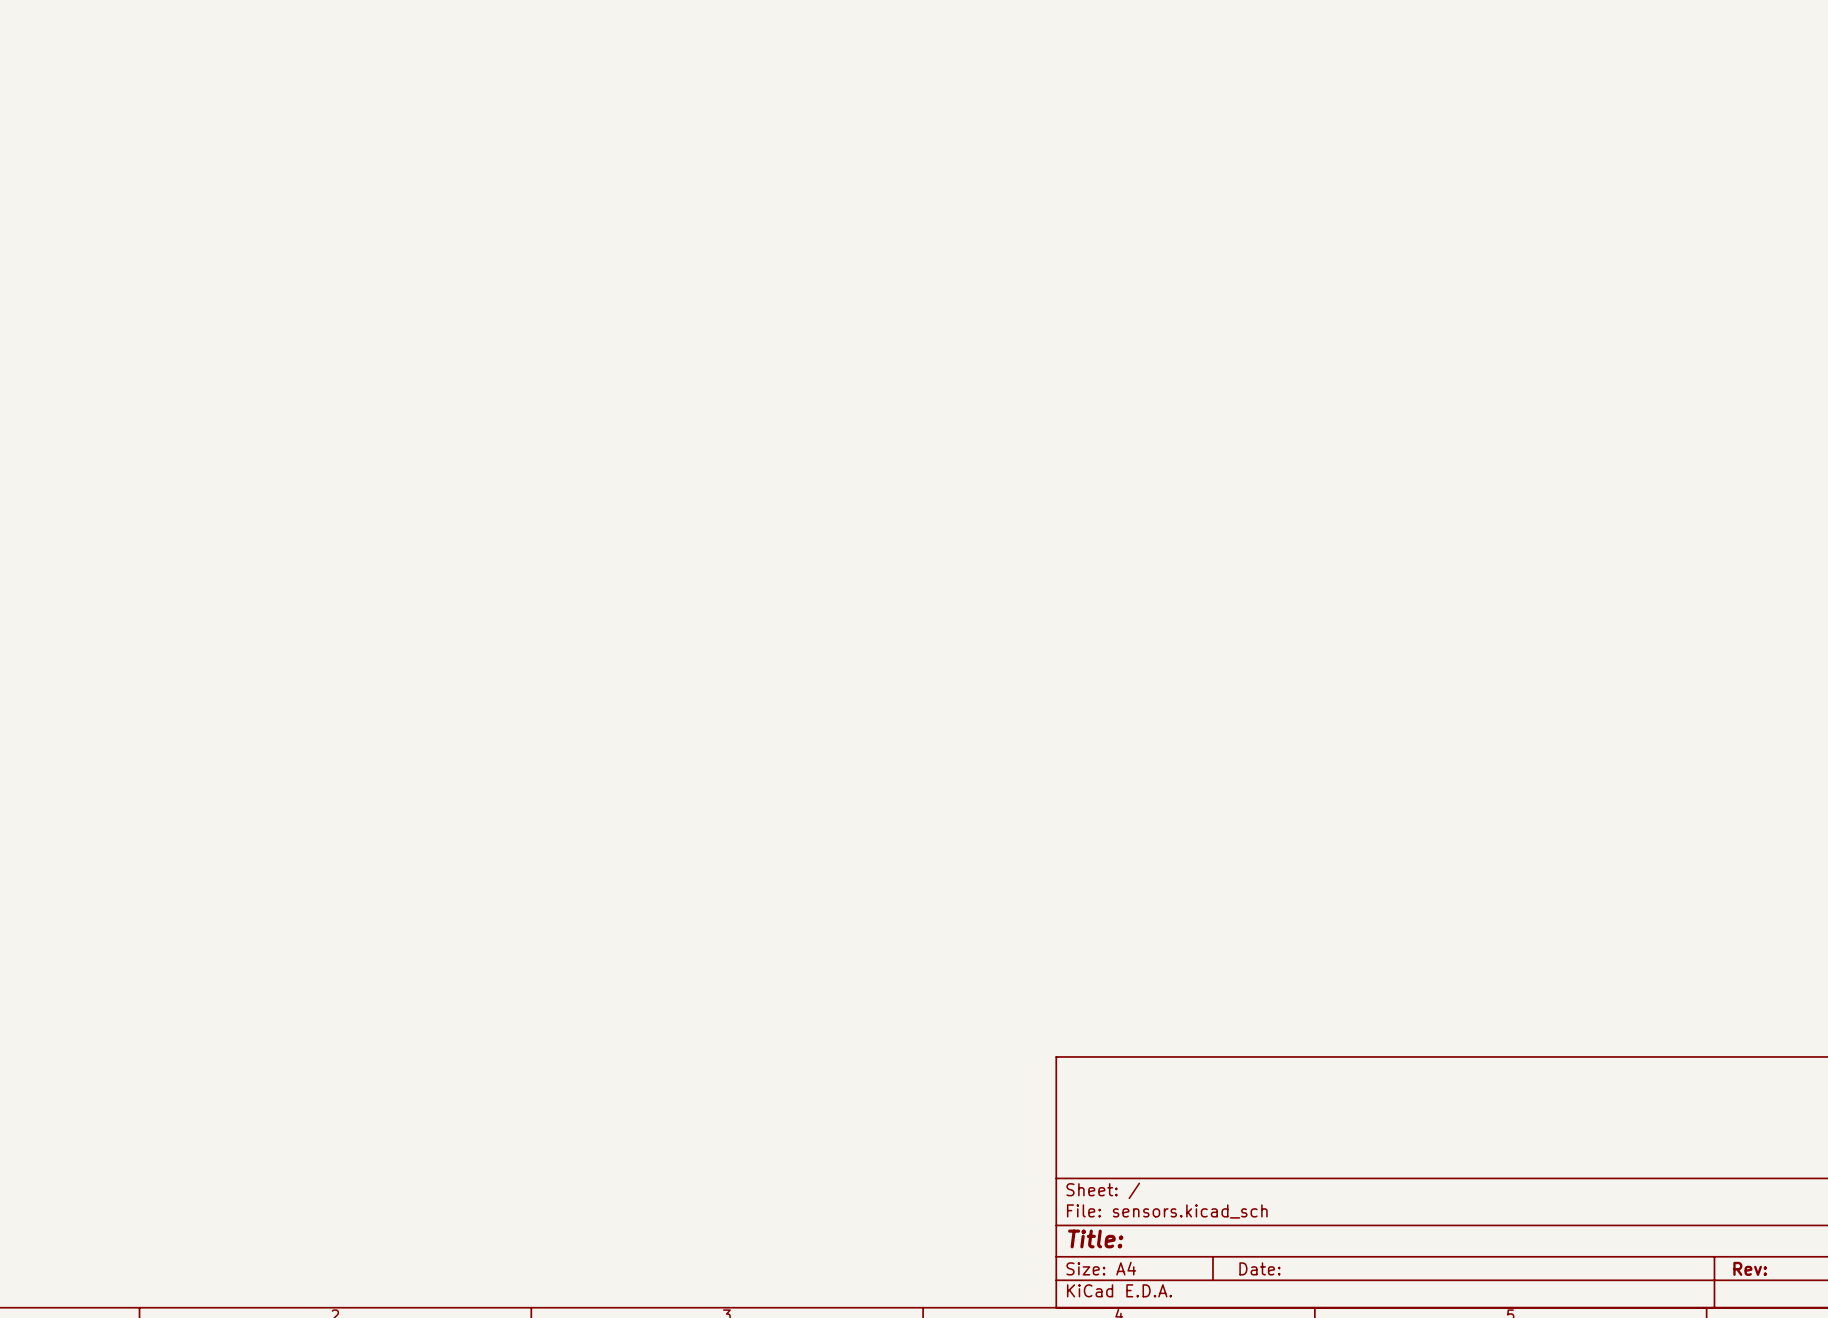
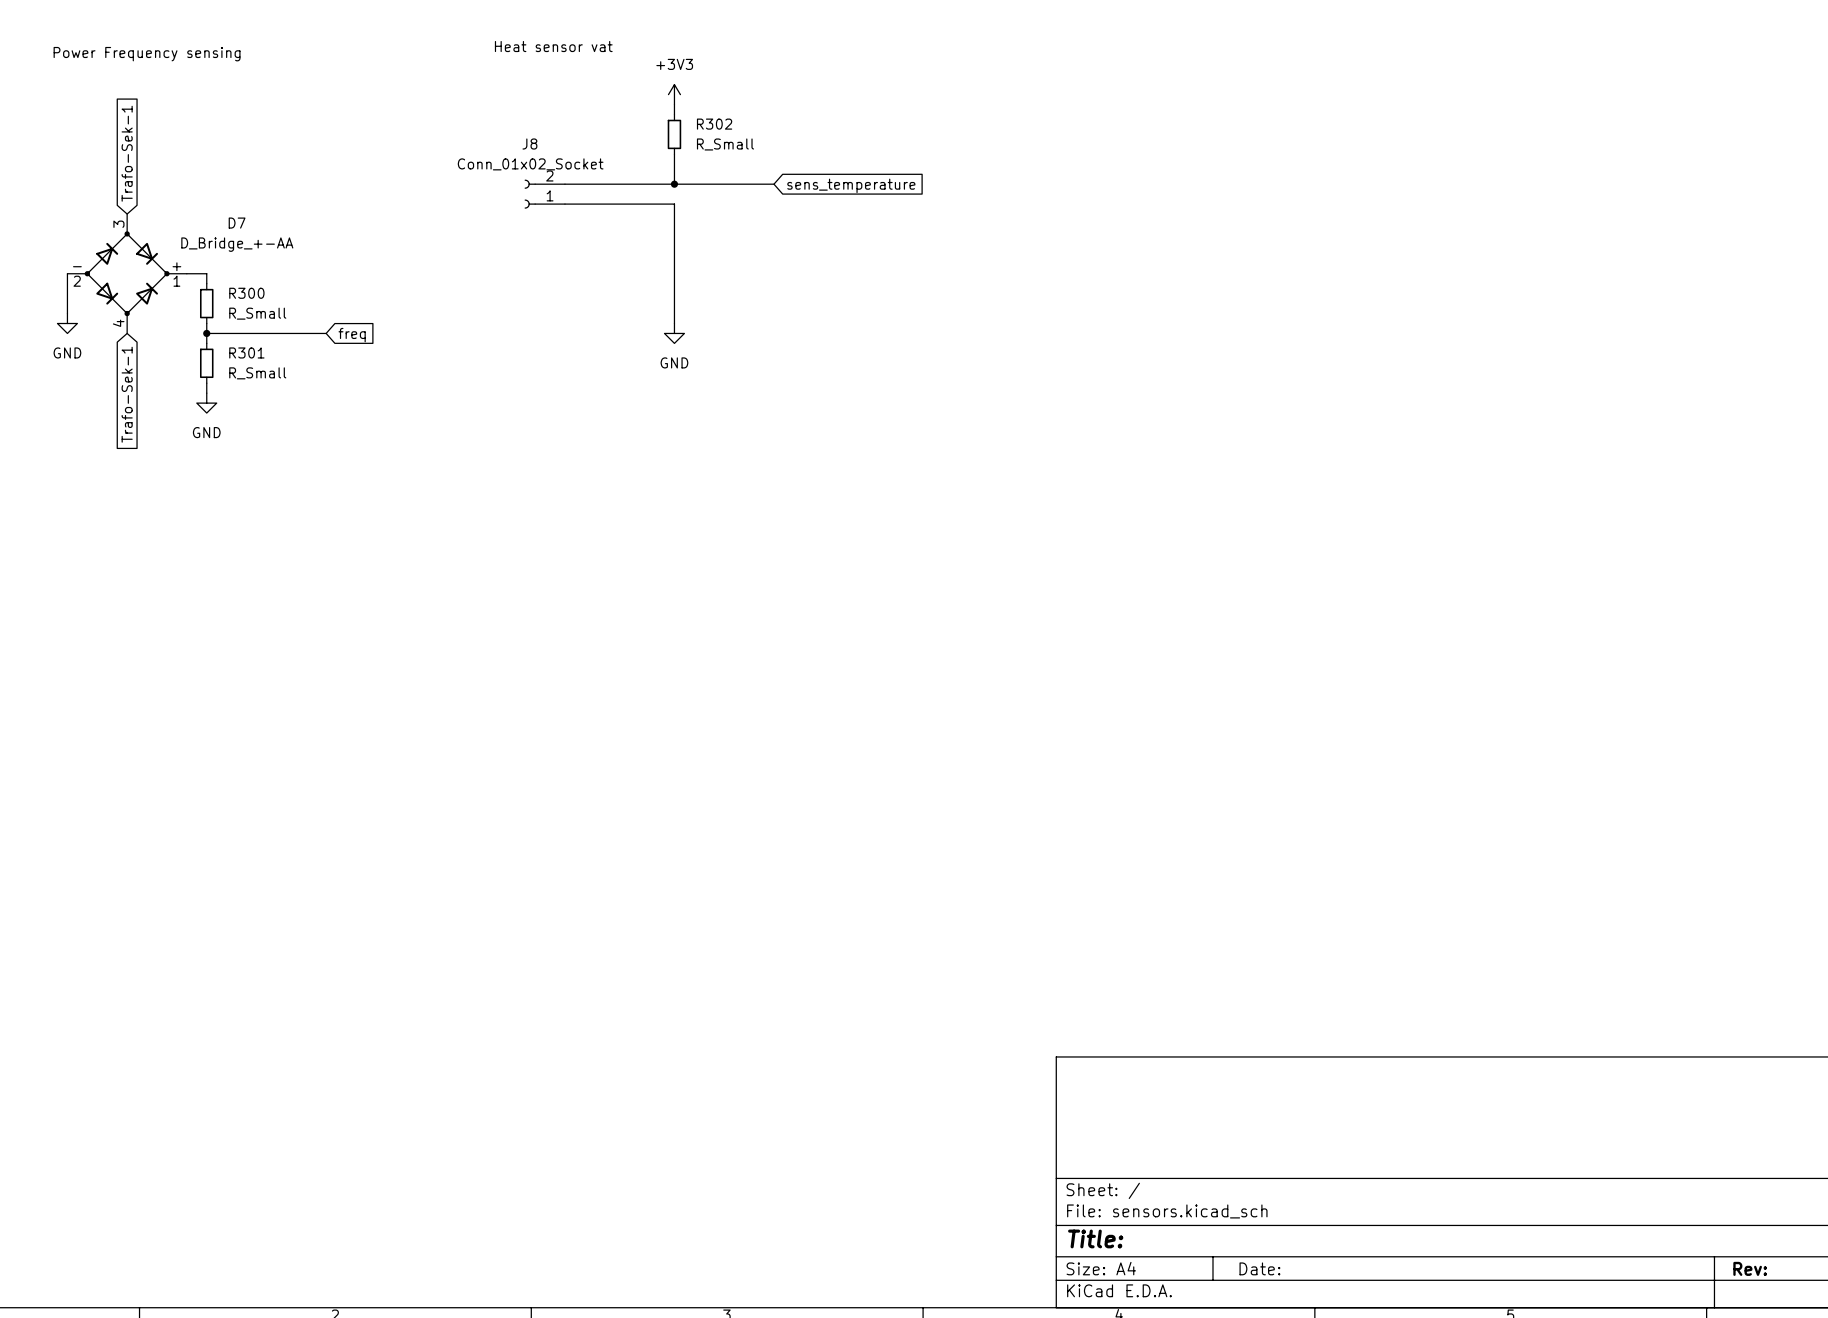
text: none -> Heat sensor vat (553, 46)
text: none -> Power Frequency sensing (147, 54)
power symbol: none -> +3V3 (674, 94)
wire: none -> (674, 104) (674, 114)
R302: none -> R_Small (674, 134)
global label: none -> Trafo-Sek-1 (127, 153)
wire: none -> (674, 154) (674, 184)
wire: none -> (564, 184) (773, 184)
junction: none -> (674, 184)
global label: none -> sens_temperature (851, 185)
J8: none -> Conn_01x02_Socket (544, 194)
wire: none -> (564, 204) (674, 204) (674, 323)
wire: none -> (67, 273) (67, 313)
D7: none -> D_Bridge_+-AA (127, 273)
wire: none -> (186, 273) (206, 273) (206, 283)
R300: none -> R_Small (206, 303)
power symbol: none -> GND (67, 323)
wire: none -> (206, 323) (206, 343)
wire: none -> (206, 333) (326, 333)
junction: none -> (206, 333)
power symbol: none -> GND (674, 333)
global label: none -> freq (352, 335)
R301: none -> R_Small (206, 363)
wire: none -> (206, 383) (206, 393)
global label: none -> Trafo-Sek-1 (127, 394)
power symbol: none -> GND (206, 403)

